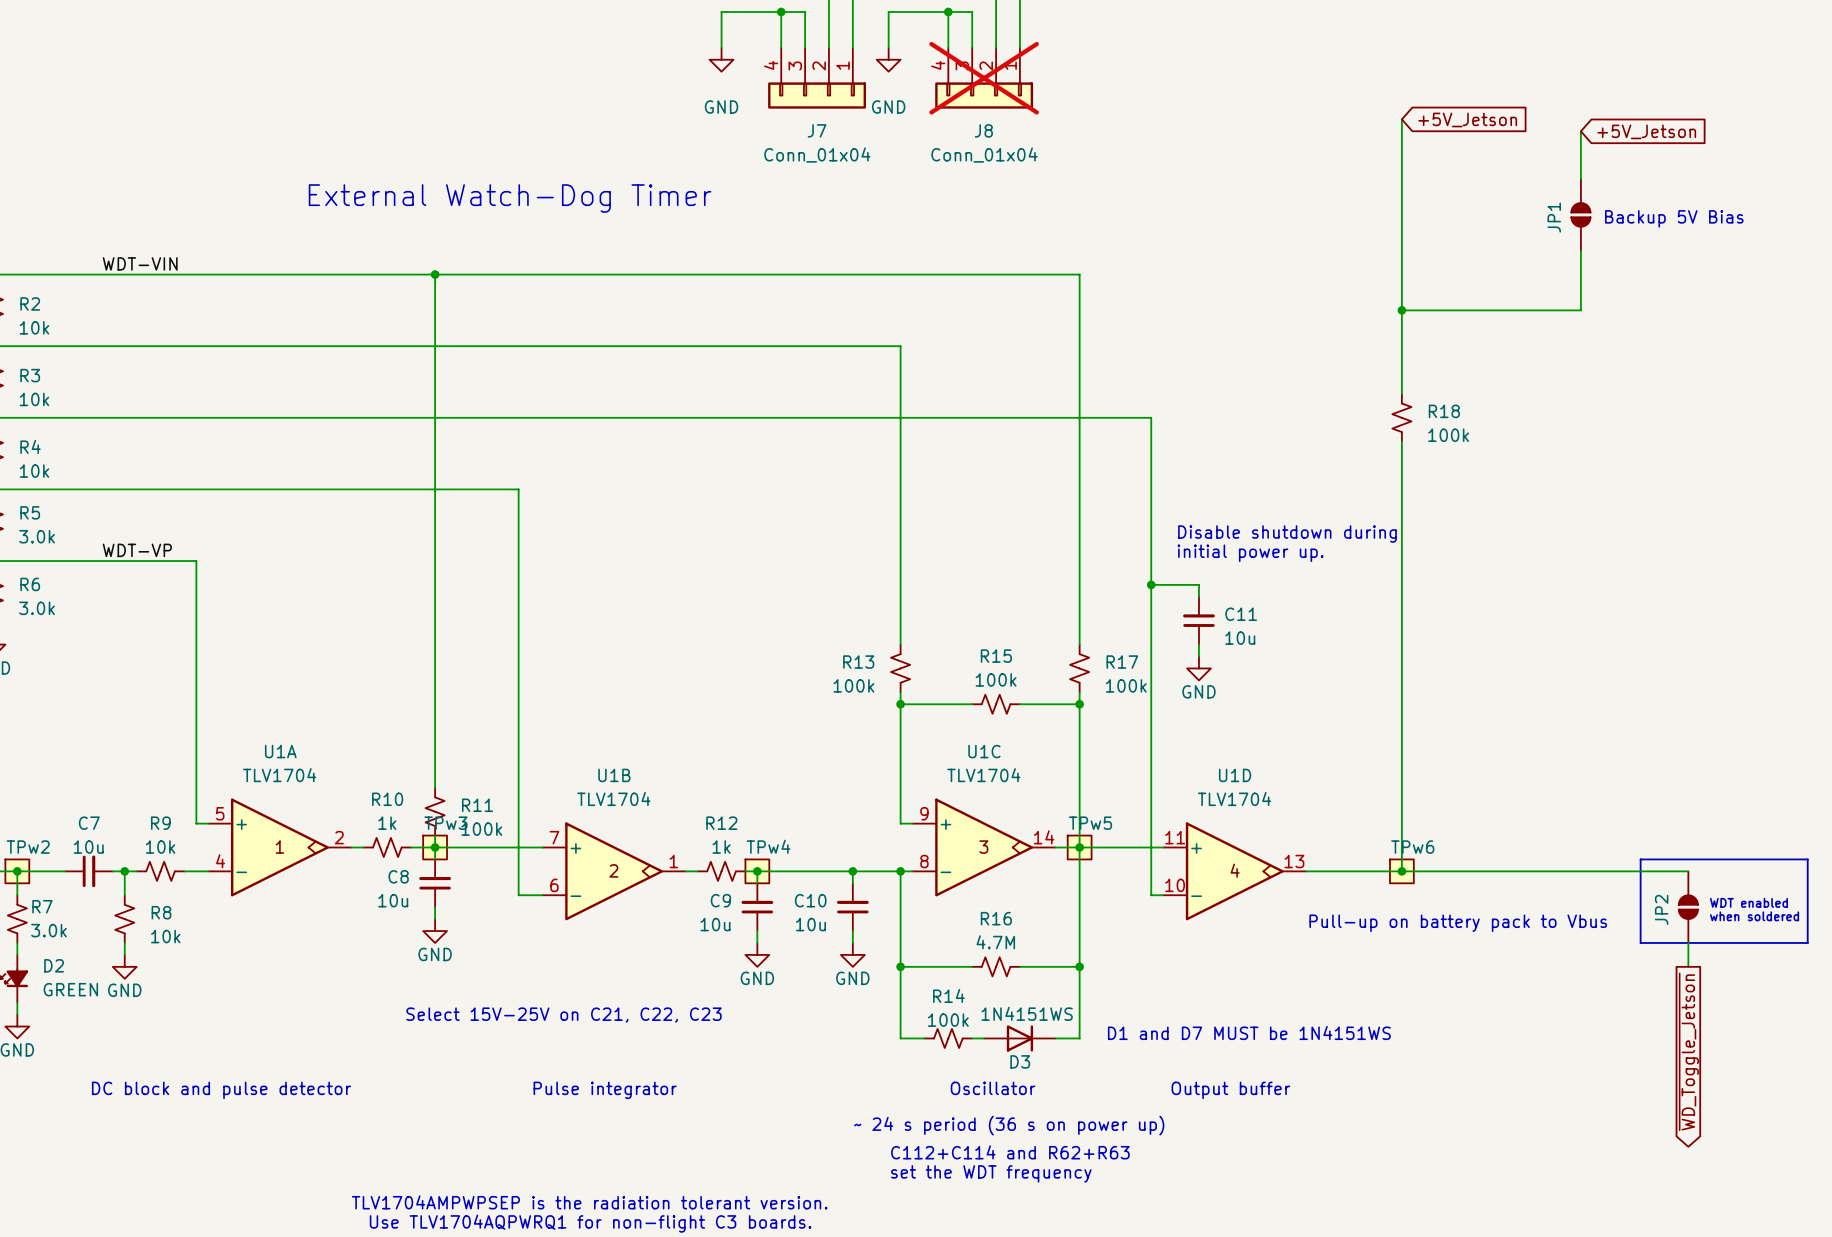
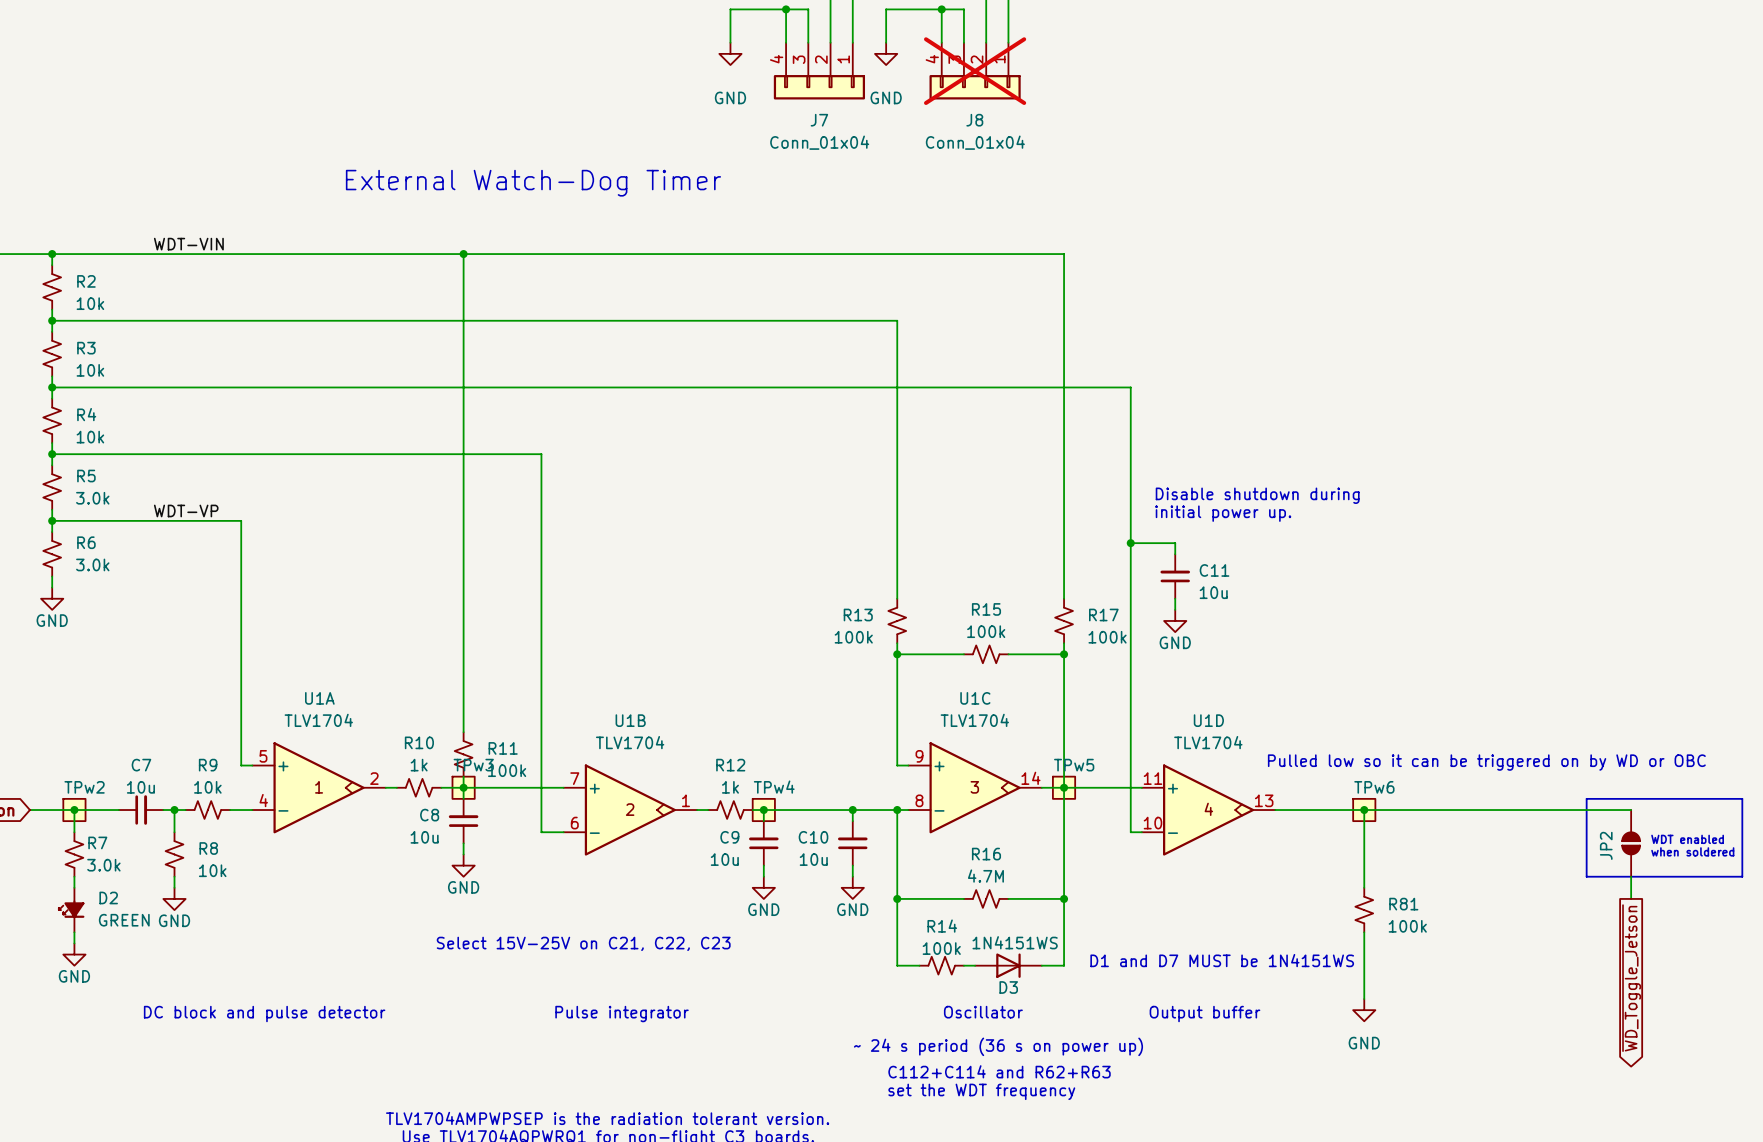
wire: (1401, 119) (1401, 393) -> none
global label: +5V_Jetson (1467, 119) -> none
wire: (1580, 131) (1580, 179) -> none
global label: +5V_Jetson (1646, 131) -> none
JP1: (1580, 214) -> none
text: Backup 5V Bias (1674, 218) -> none
wire: (1580, 250) (1580, 310) (1401, 310) -> none
junction: (1401, 310) -> none
R18: 100k (1401, 417) -> none
wire: (1401, 441) (1401, 871) -> (1364, 887) (1364, 810)
text: none -> Pulled low so it can be triggered on by WD or OBC (1486, 762)
text: Pull-up on battery pack to Vbus (1458, 923) -> none
R81: none -> 100k (1364, 910)
wire: none -> (1364, 932) (1364, 999)
power symbol: none -> GND (1364, 1010)

